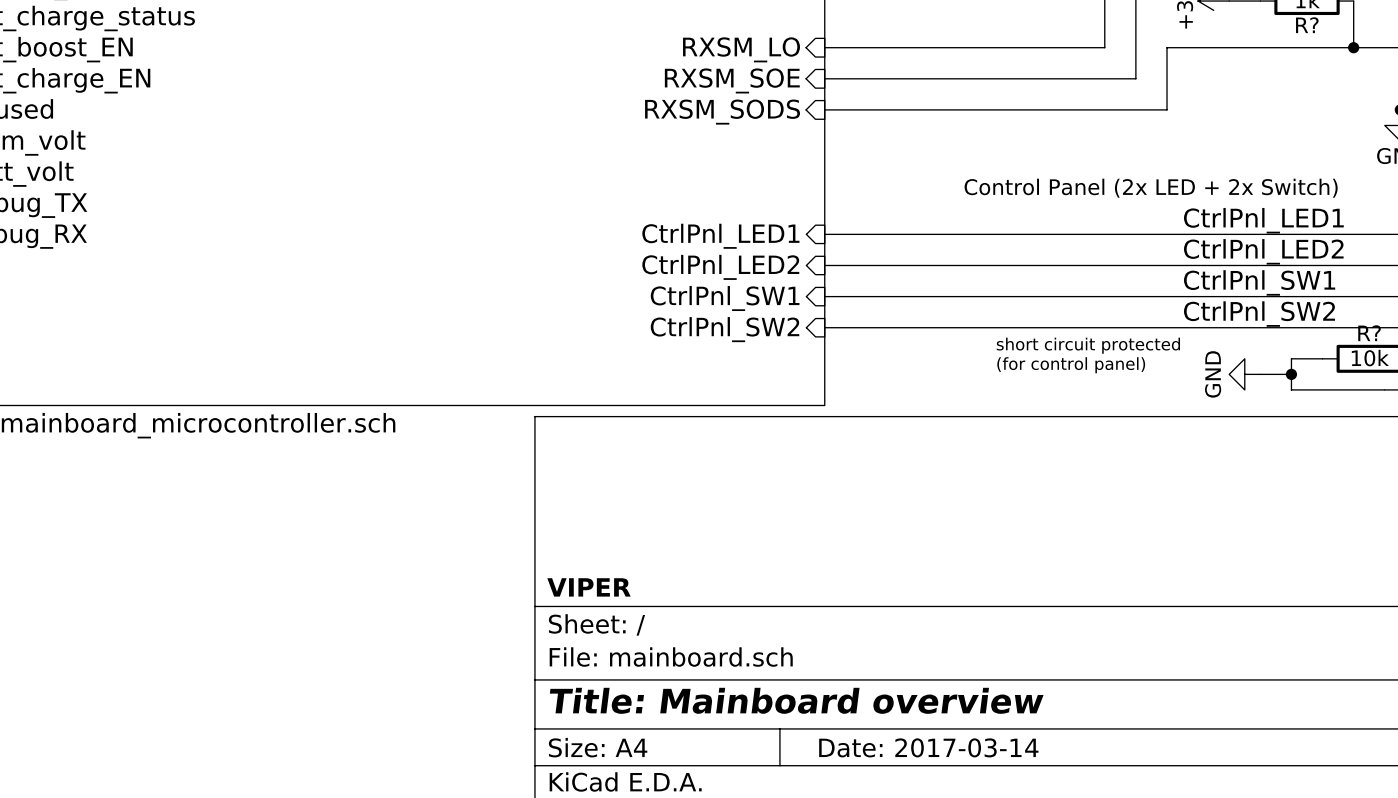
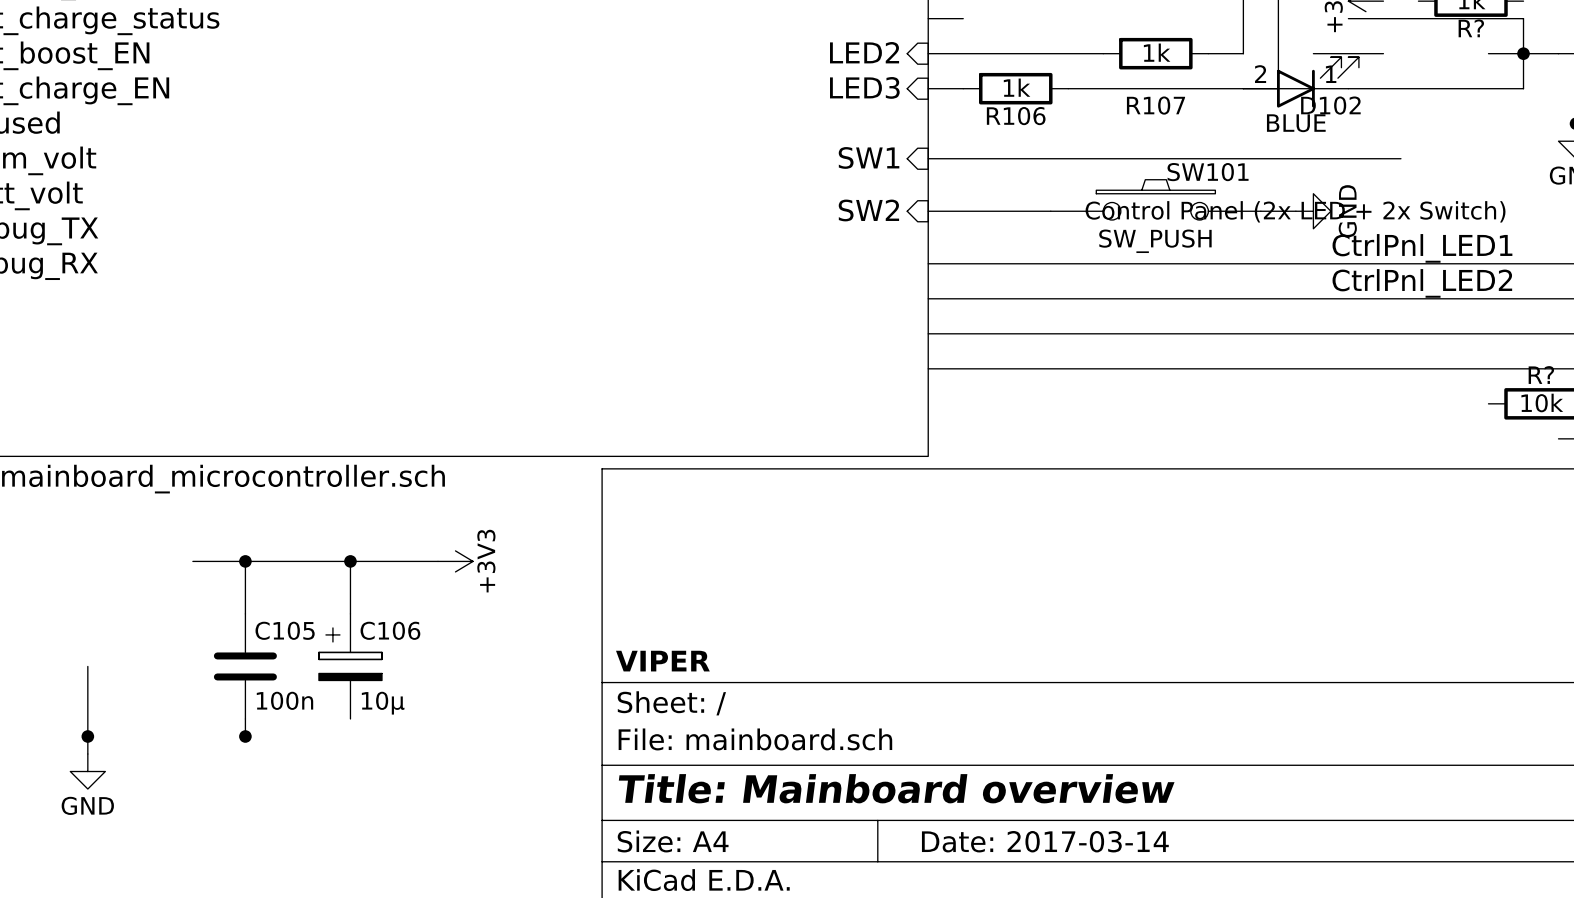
wire: (1229, 1) (1260, 1) -> (1260, 211) (1295, 211)
wire: (1353, 1) (1353, 16) -> (1348, 18) (1523, 18)
wire: none -> (928, 18) (963, 18)
wire: (980, 47) (1073, 47) -> none
R107: none -> 1k (1155, 53)
wire: (1167, 47) (1167, 109) (824, 109) -> none
wire: (1229, 47) (1322, 47) -> none
wire: none -> (1523, 53) (1523, 88) (1348, 88)
sheet pin: RXSM_LO (741, 49) -> LED2 (864, 52)
D102: none -> BLUE (1301, 82)
wire: (855, 78) (949, 78) -> none
R106: none -> 1k (1015, 88)
sheet pin: RXSM_SOE (732, 80) -> LED3 (864, 87)
sheet pin: RXSM_SODS (722, 112) -> none
sheet pin: none -> SW1 (869, 157)
wire: none -> (928, 158) (1400, 158)
SW101: none -> SW_PUSH (1155, 199)
sheet pin: none -> SW2 (868, 210)
wire: none -> (928, 211) (1050, 211)
power symbol: none -> GND (1313, 211)
sheet pin: CtrlPnl_LED1 (720, 236) -> none
sheet pin: CtrlPnl_LED2 (720, 267) -> none
label: CtrlPnl_SW1 (1259, 282) -> none
sheet pin: CtrlPnl_SW1 (725, 298) -> none
label: CtrlPnl_SW2 (1259, 314) -> none
sheet pin: CtrlPnl_SW2 (725, 329) -> none
text: short circuit protected (1088, 345) -> none
wire: (1322, 358) (1291, 358) (1291, 389) (1384, 389) -> none
text: (for control panel) (1071, 365) -> none
power symbol: GND (1244, 374) -> none
wire: (1260, 374) (1291, 374) -> none
junction: (1291, 374) -> none
wire: none -> (192, 561) (438, 561)
wire: none -> (245, 561) (245, 613)
junction: none -> (245, 561)
wire: none -> (350, 561) (350, 613)
junction: none -> (350, 561)
power symbol: none -> +3V3 (455, 561)
wire: none -> (87, 666) (87, 754)
C105: none -> 100n (245, 666)
C106: none -> 10µ (350, 666)
wire: none -> (245, 718) (245, 736)
junction: none -> (87, 736)
junction: none -> (245, 736)
power symbol: none -> GND (87, 771)

